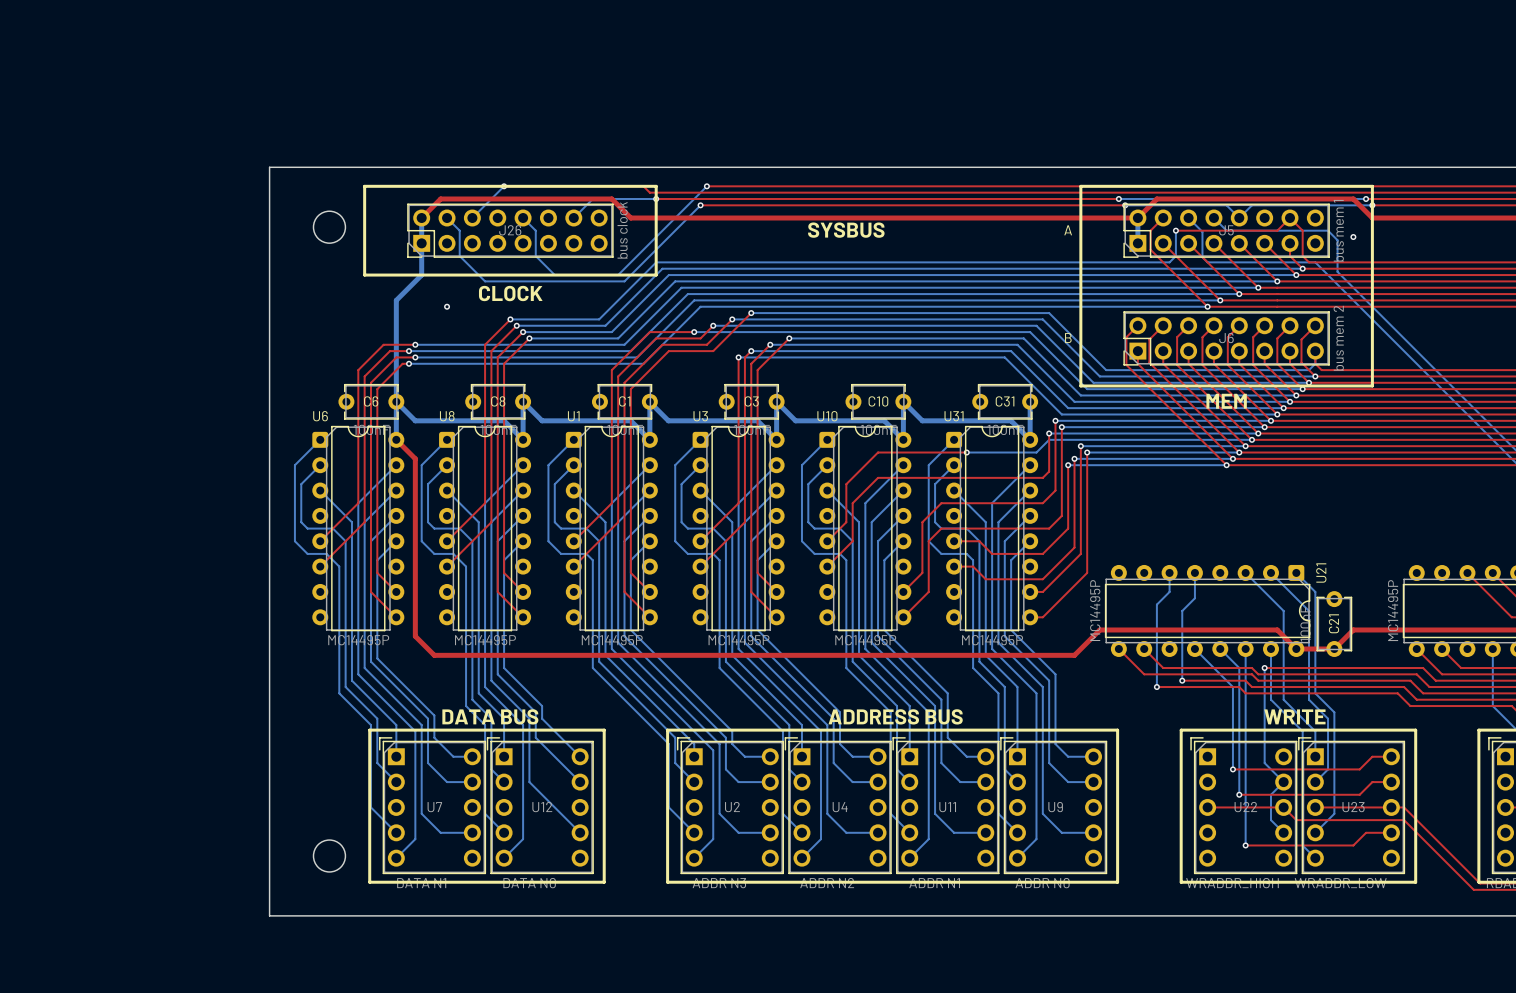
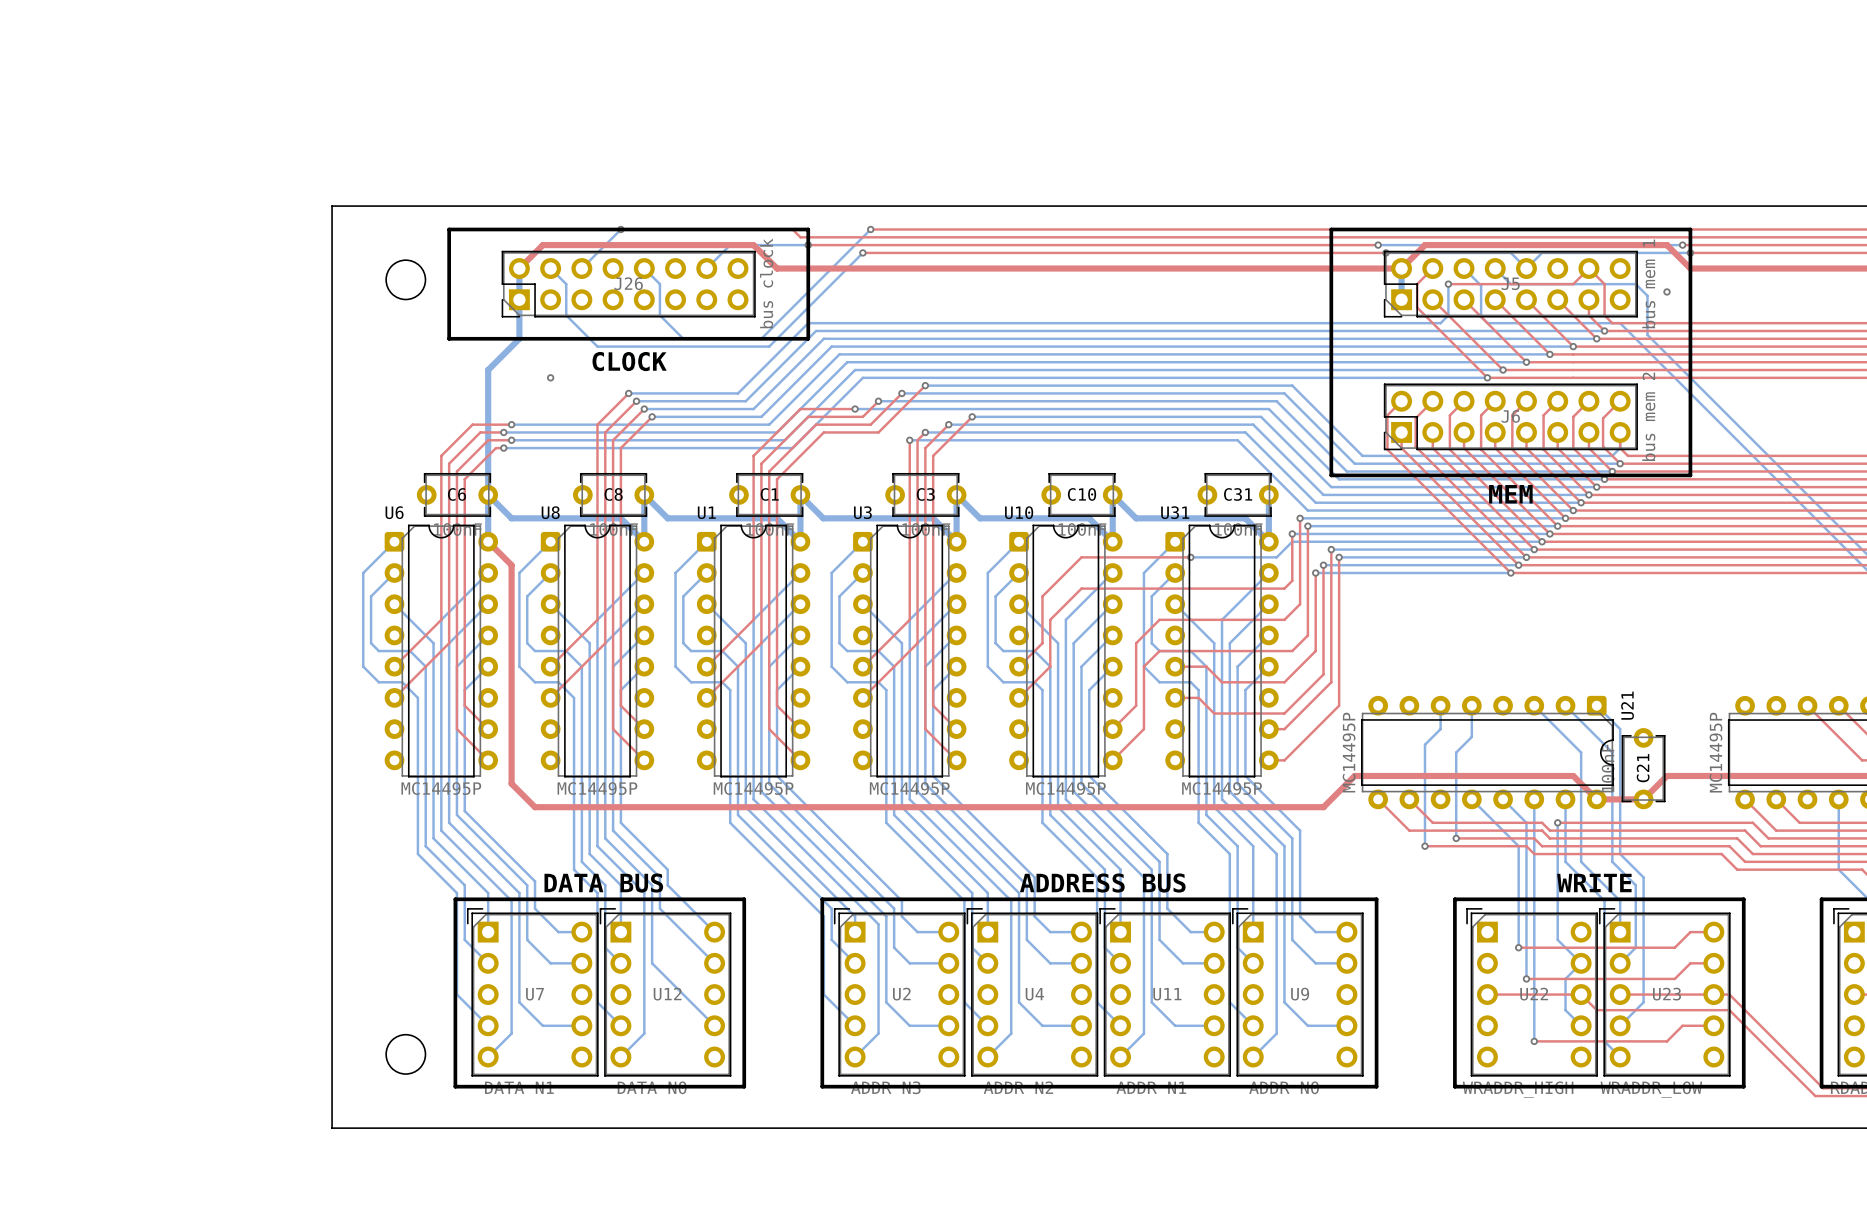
text: SYSBUS (846, 230) -> none
text: A (1068, 230) -> none
text: B (1068, 338) -> none

